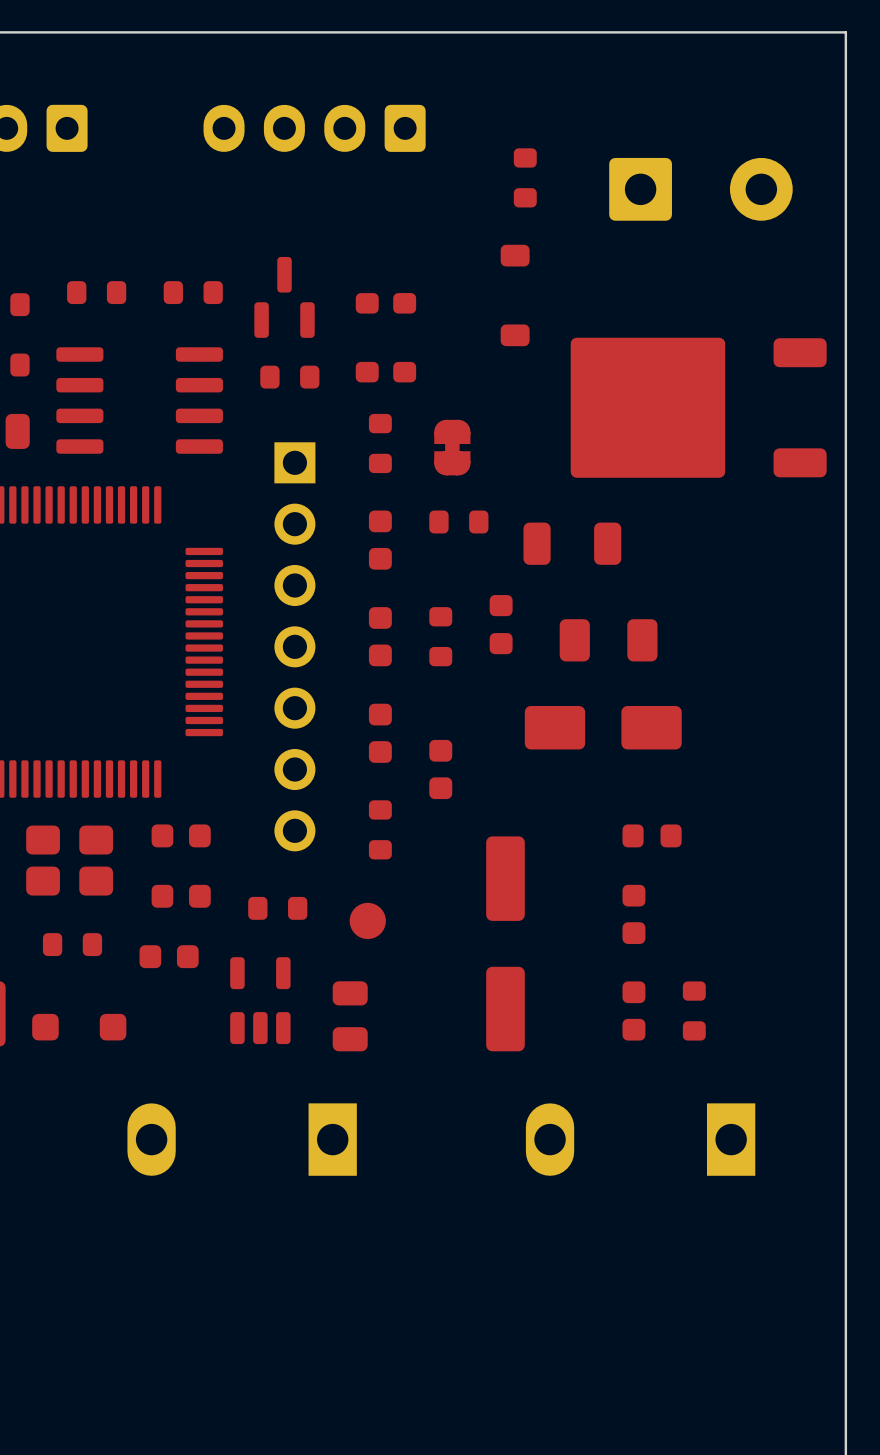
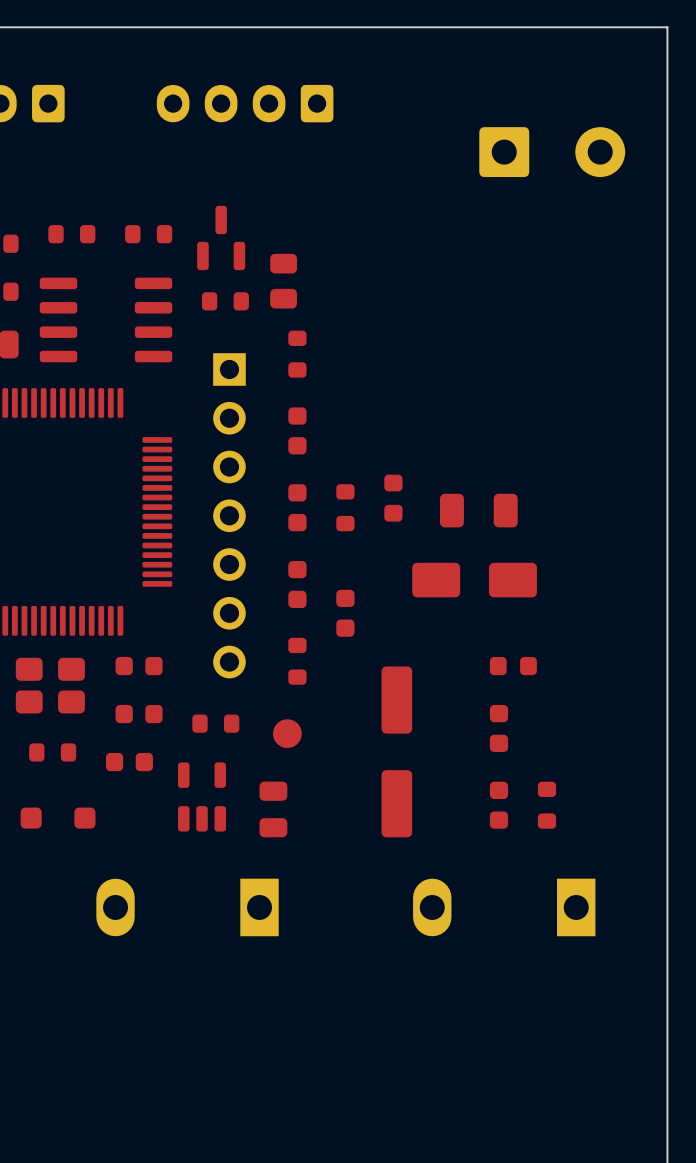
part: (525, 177) -> none
part: (515, 295) -> none
part: (385, 337) -> none
part: none -> (283, 281)
part: (698, 407) -> none
part: (452, 447) -> none
part: (458, 521) -> none
part: (572, 543) -> none

